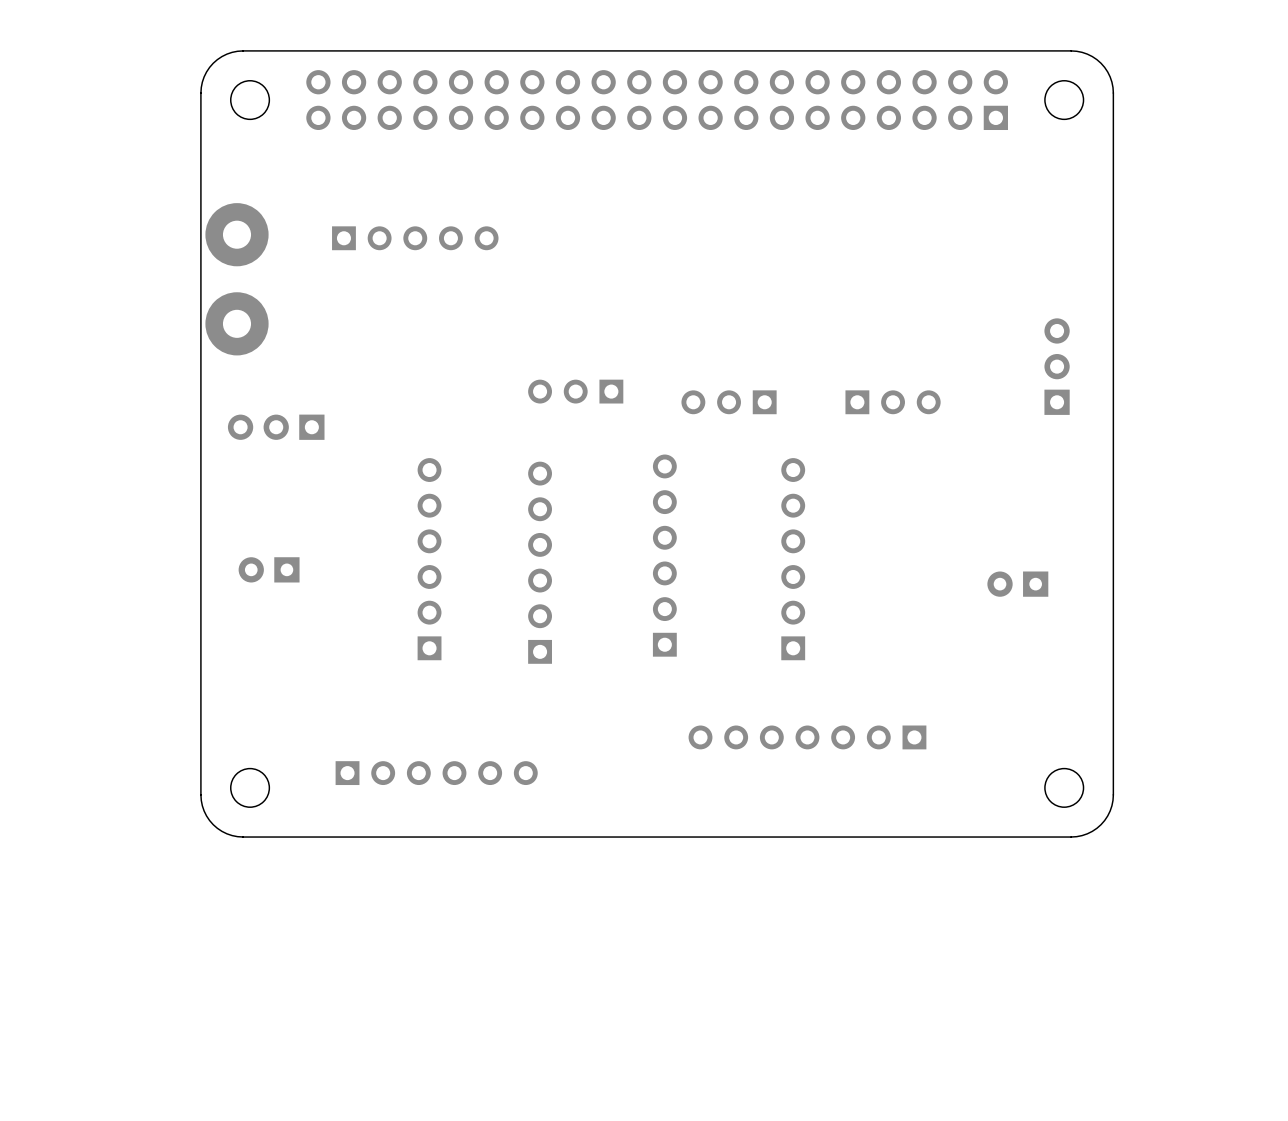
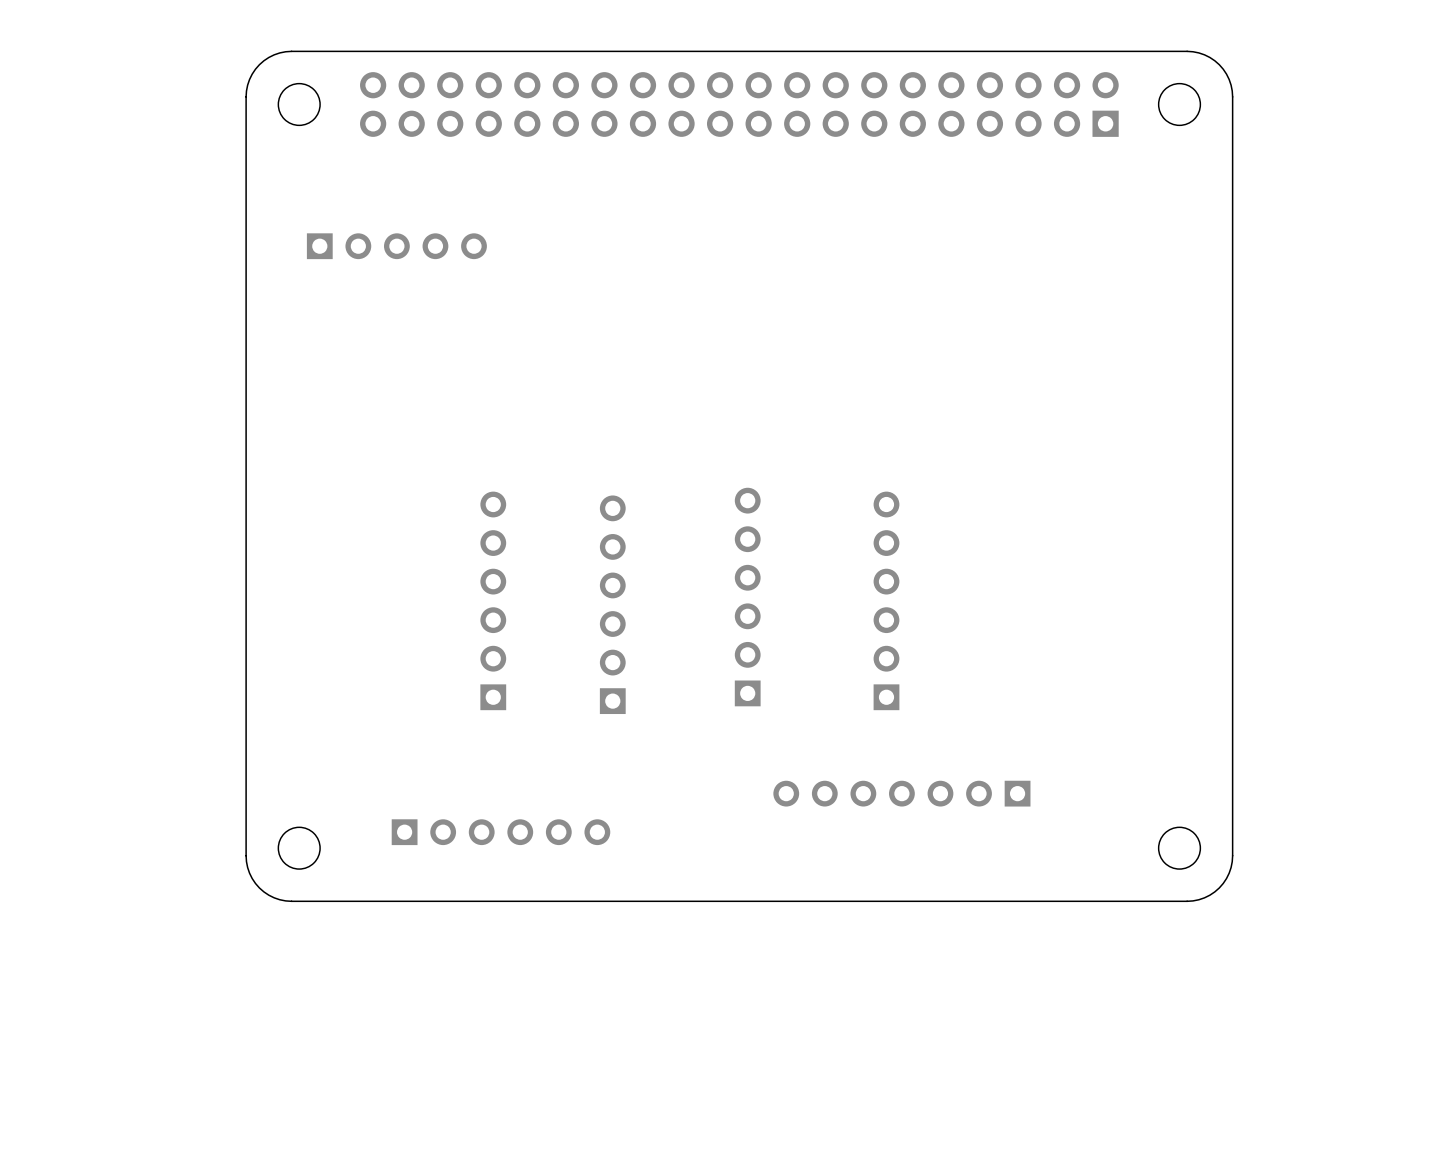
part position: (415, 238) -> (396, 246)
part: (237, 279) -> none
part: (1057, 366) -> none
part: (575, 391) -> none
part: (729, 402) -> none
part: (893, 402) -> none
part: (276, 427) -> none
part: (269, 569) -> none
part: (1017, 584) -> none

